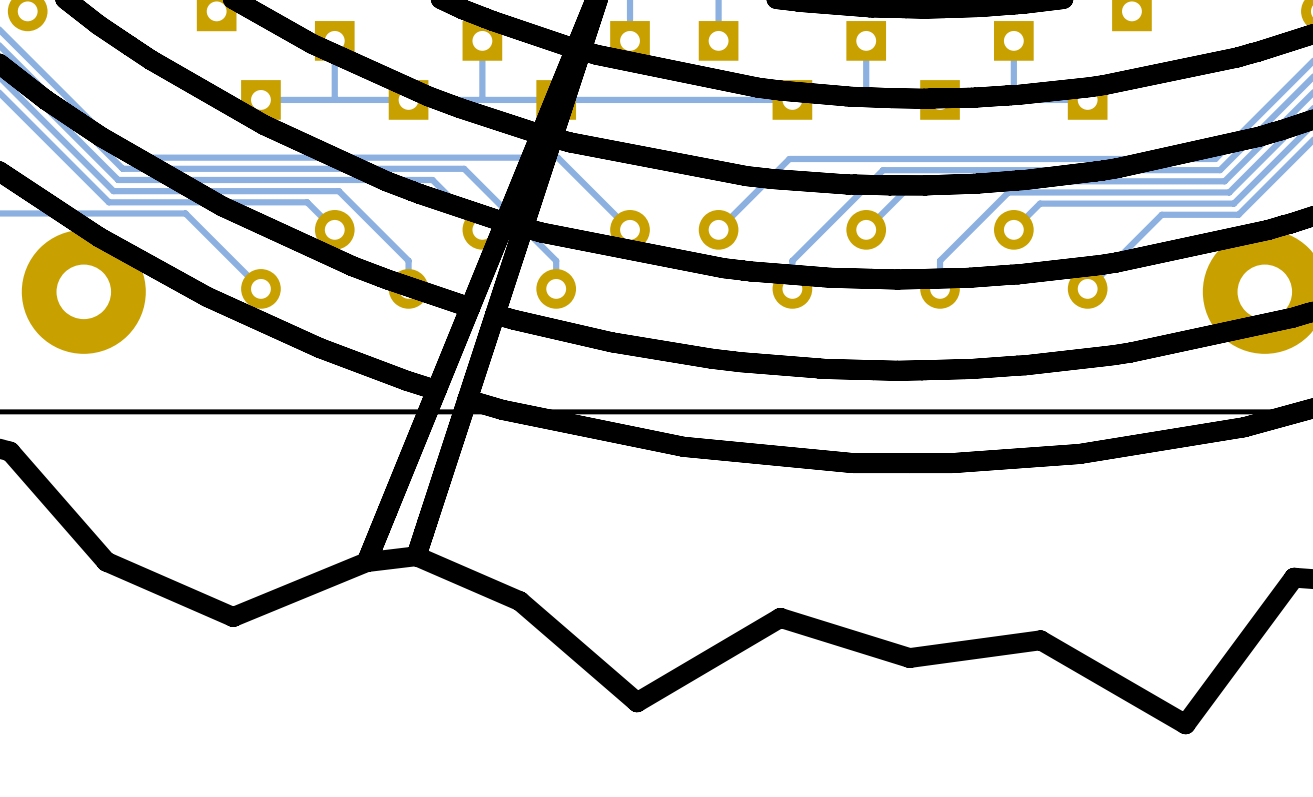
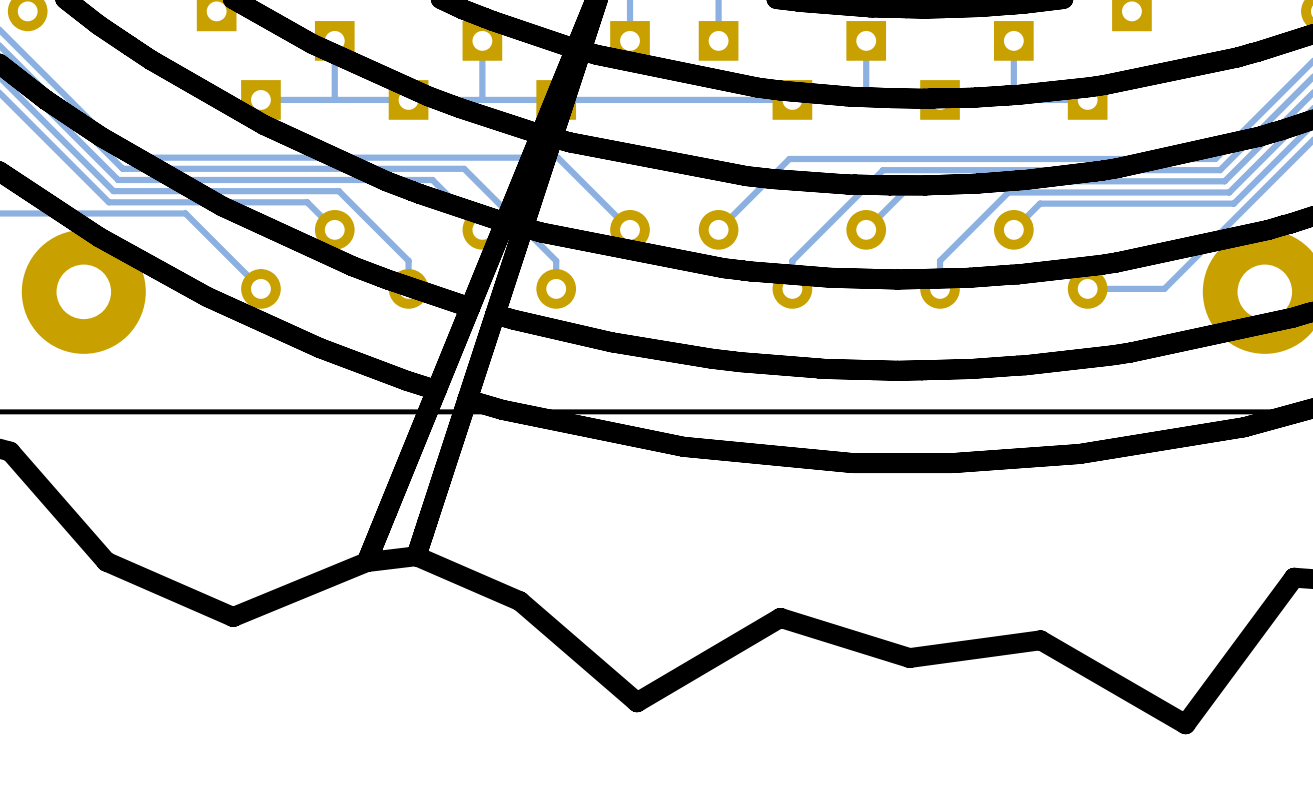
track: (1238, 214) (1161, 214) (1087, 288) -> (1238, 214) (1164, 288) (1087, 288)

